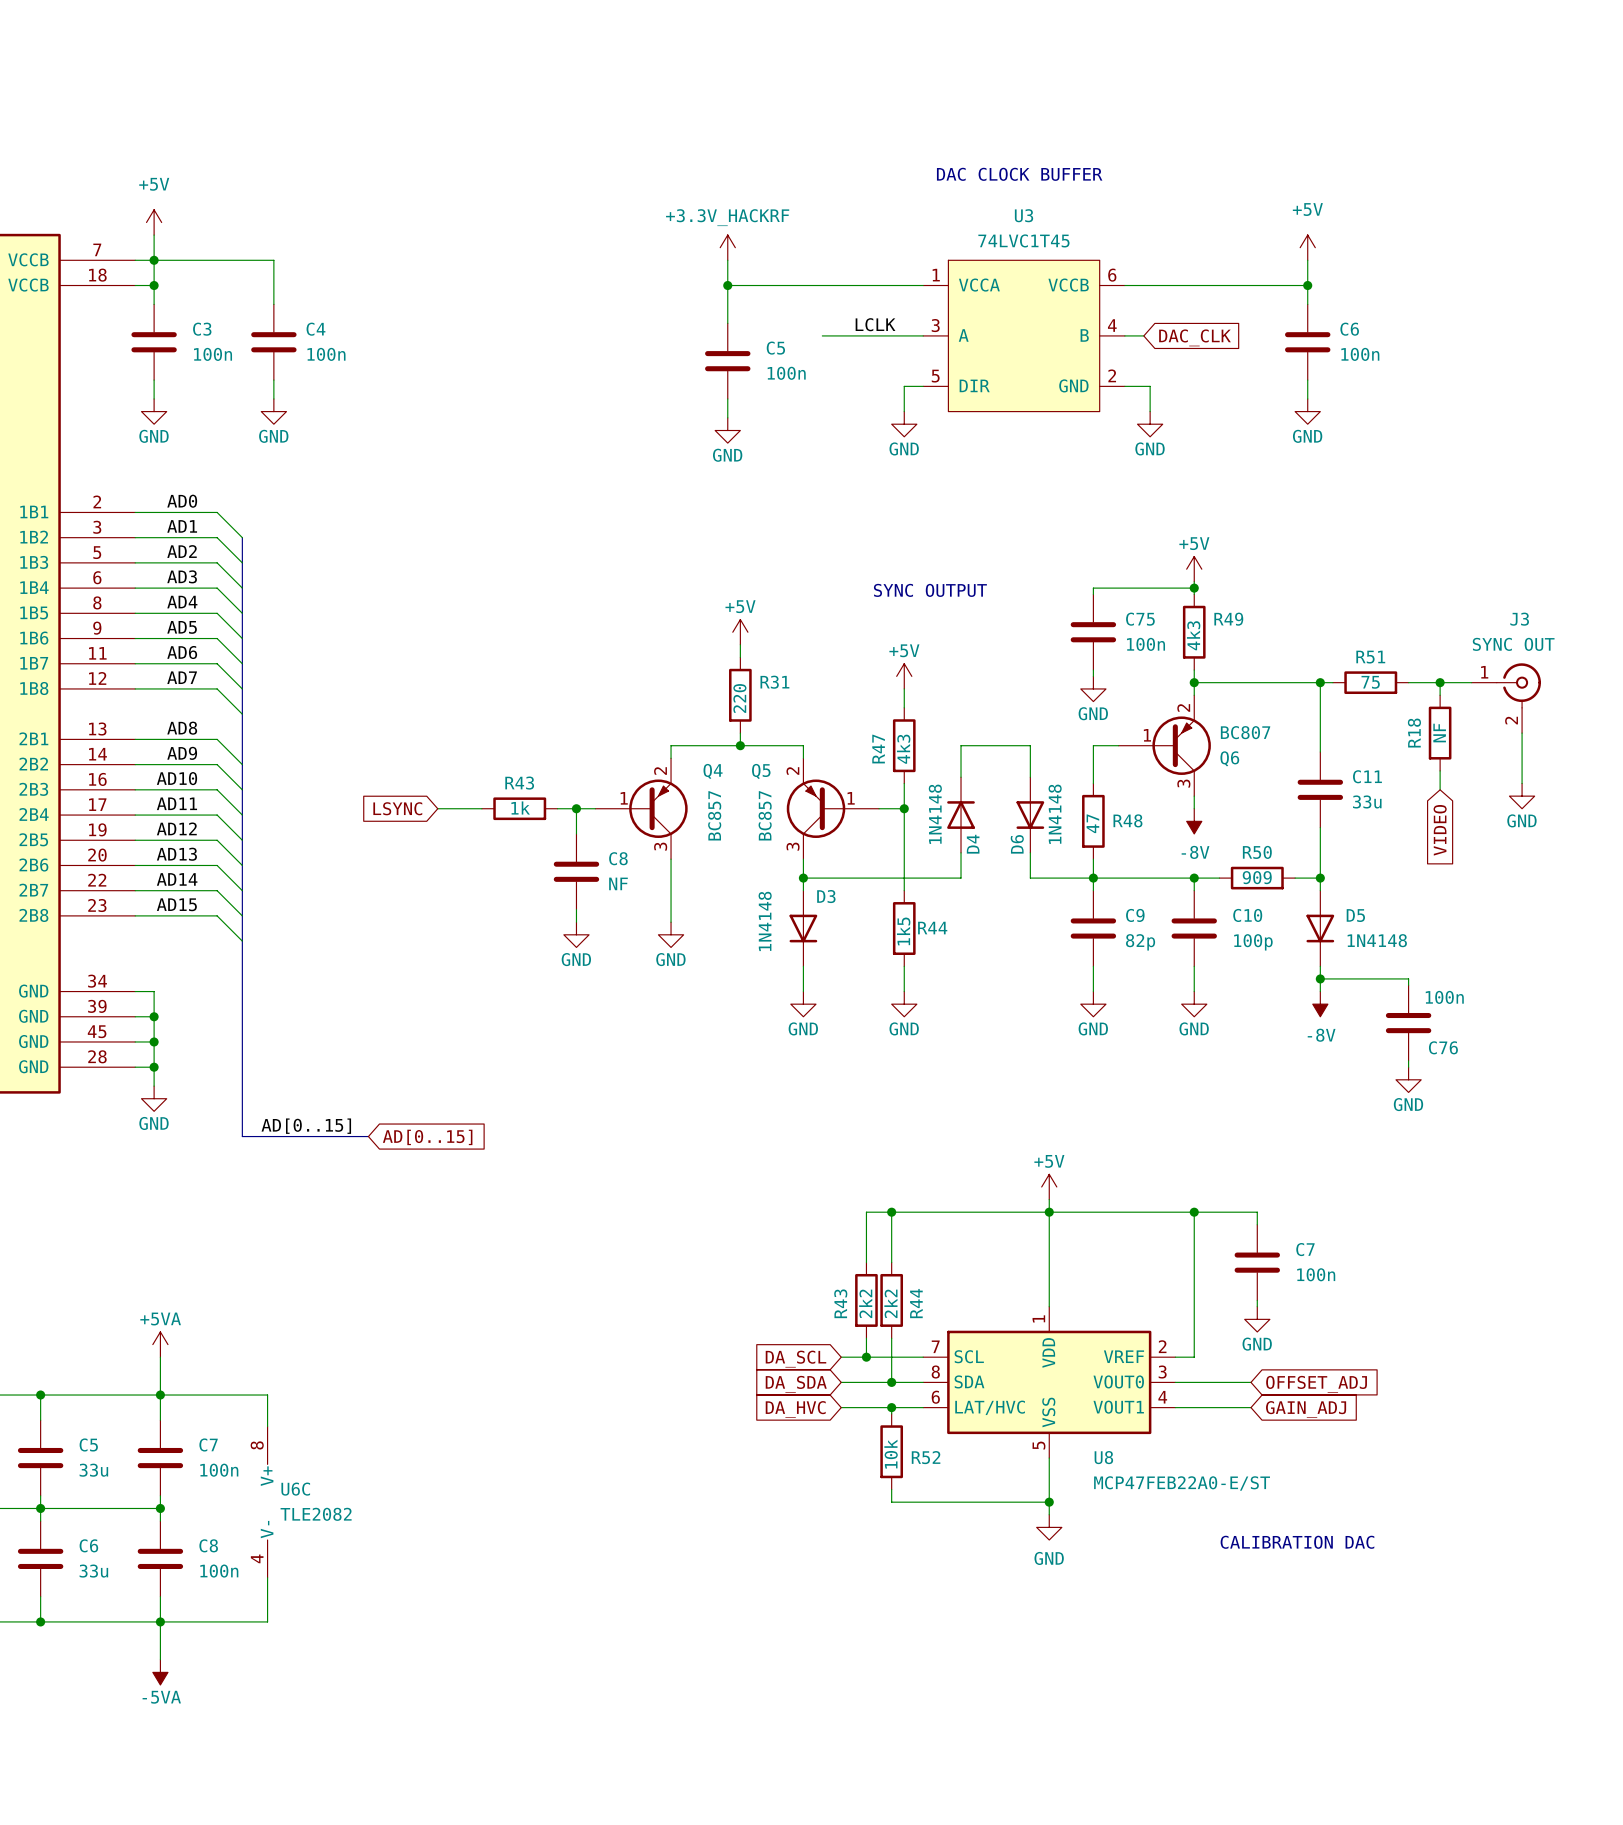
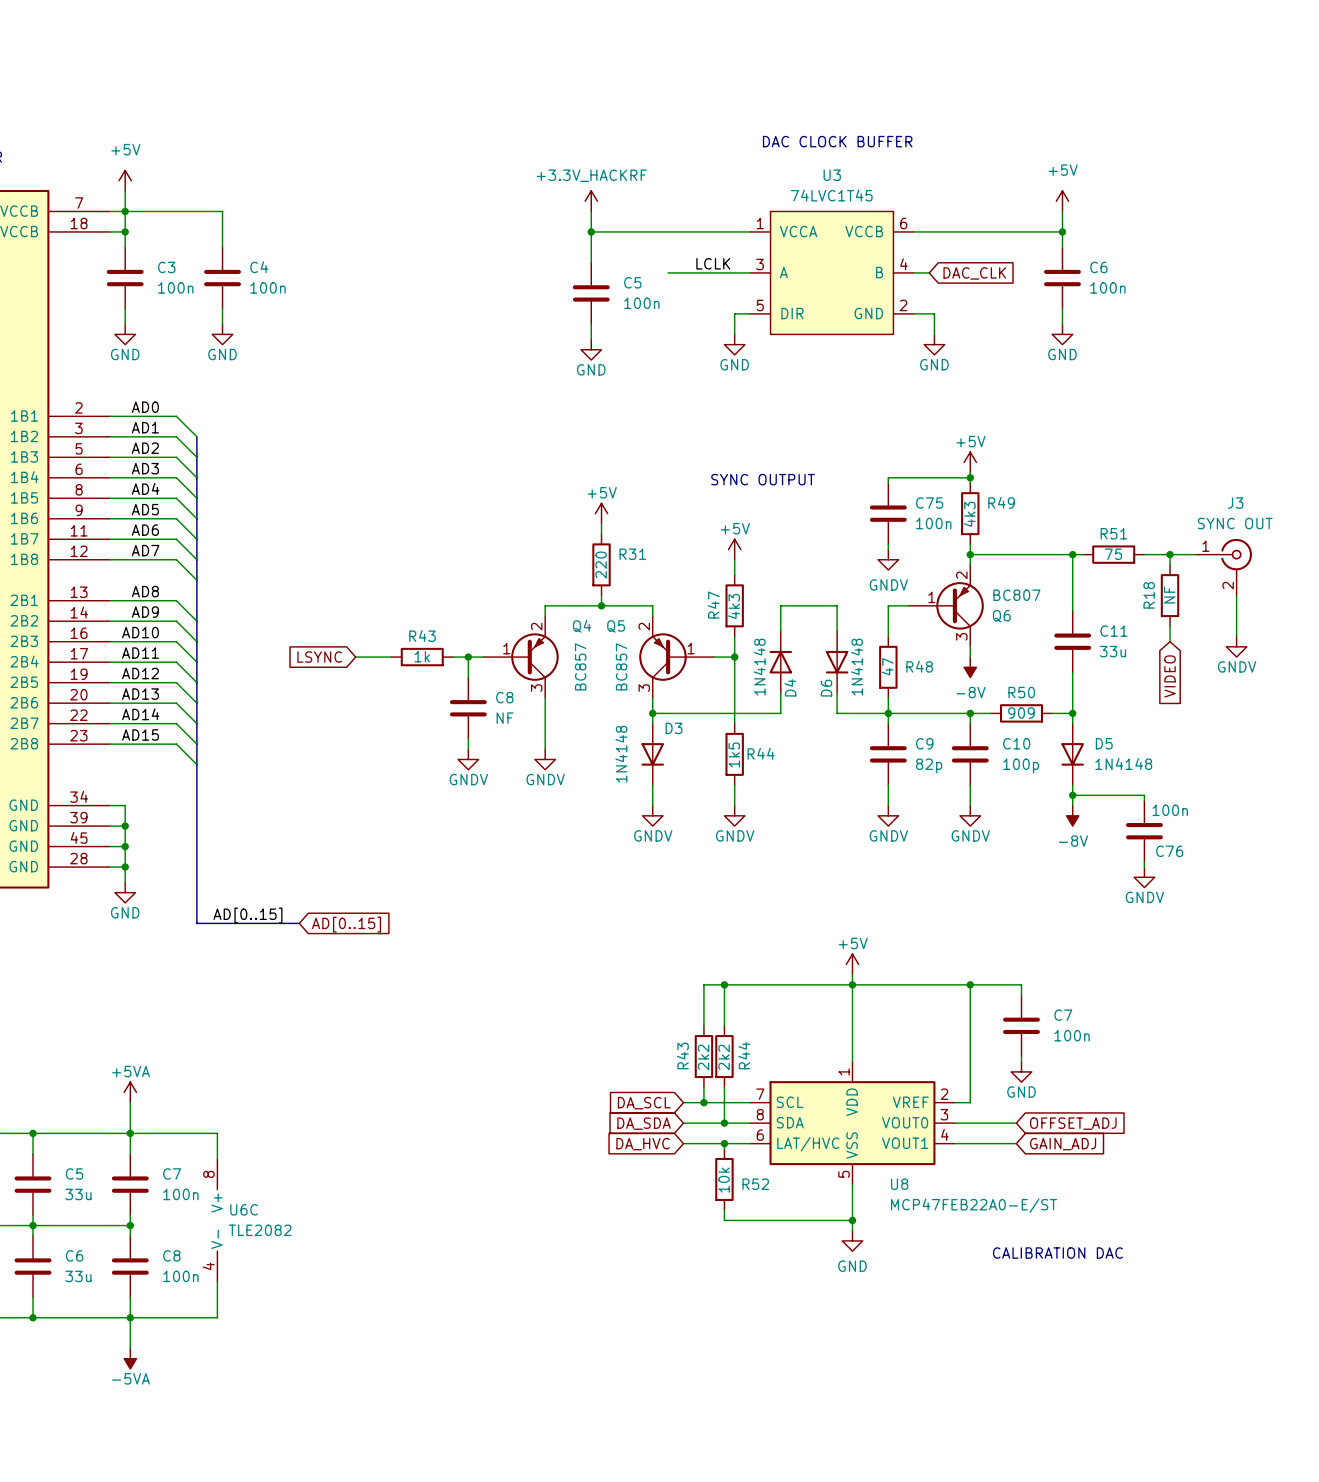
power symbol: GND (1093, 688) -> GNDV (888, 559)
power symbol: GND (1522, 796) -> GNDV (1236, 646)
power symbol: GND (576, 934) -> GNDV (468, 759)
power symbol: GND (671, 934) -> GNDV (545, 759)
power symbol: GND (803, 1004) -> GNDV (652, 815)
power symbol: GND (904, 1004) -> GNDV (734, 815)
power symbol: GND (1093, 1004) -> GNDV (888, 815)
power symbol: GND (1194, 1004) -> GNDV (970, 815)
power symbol: GND (1408, 1079) -> GNDV (1144, 877)

